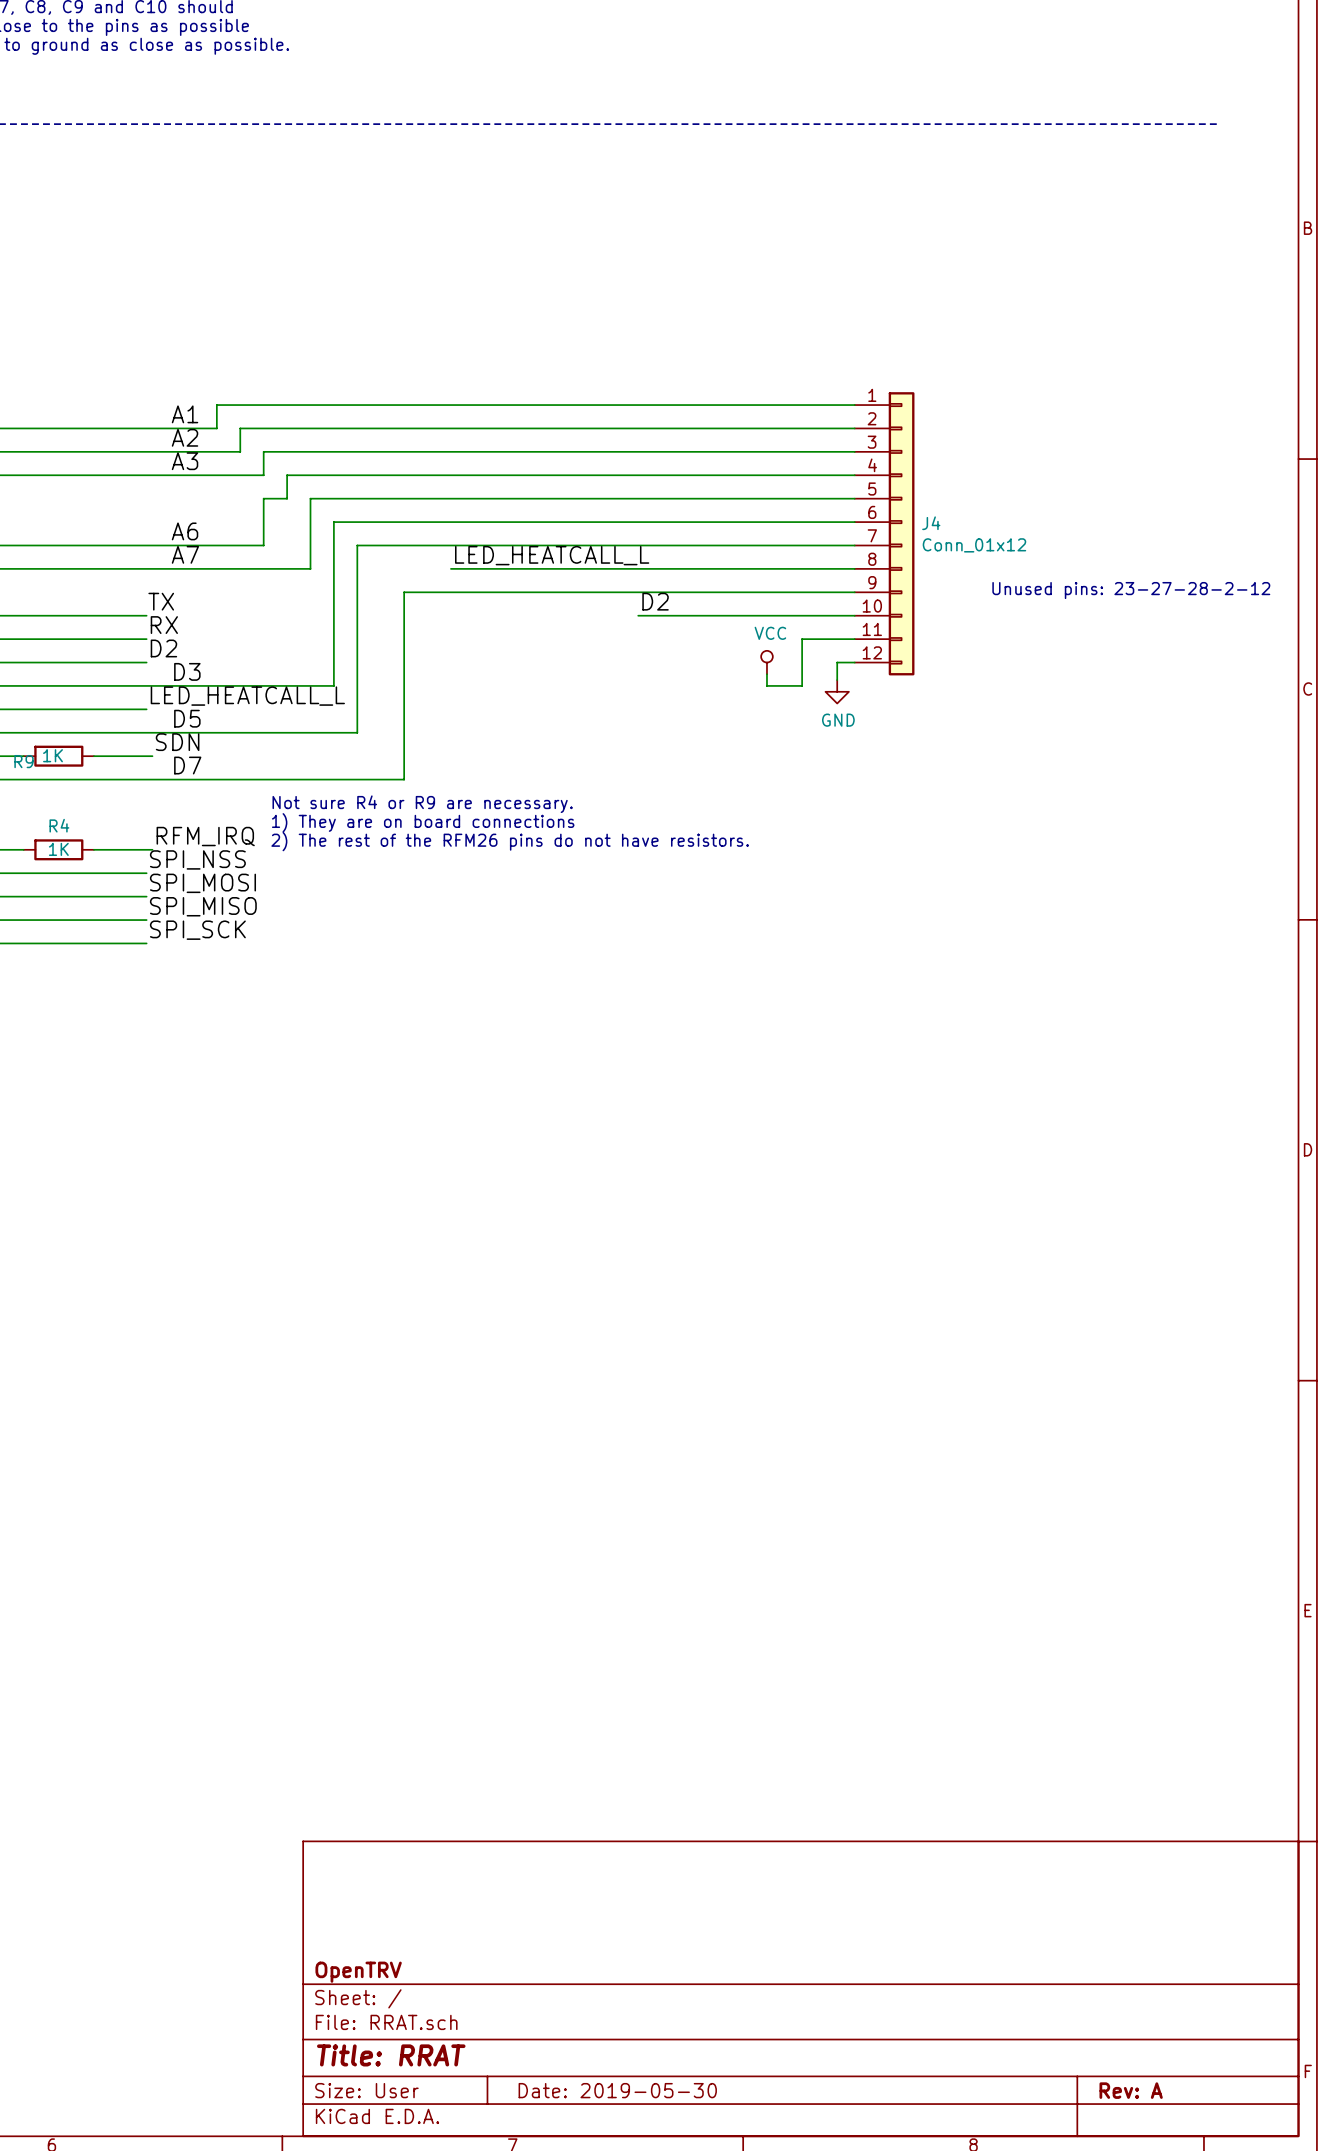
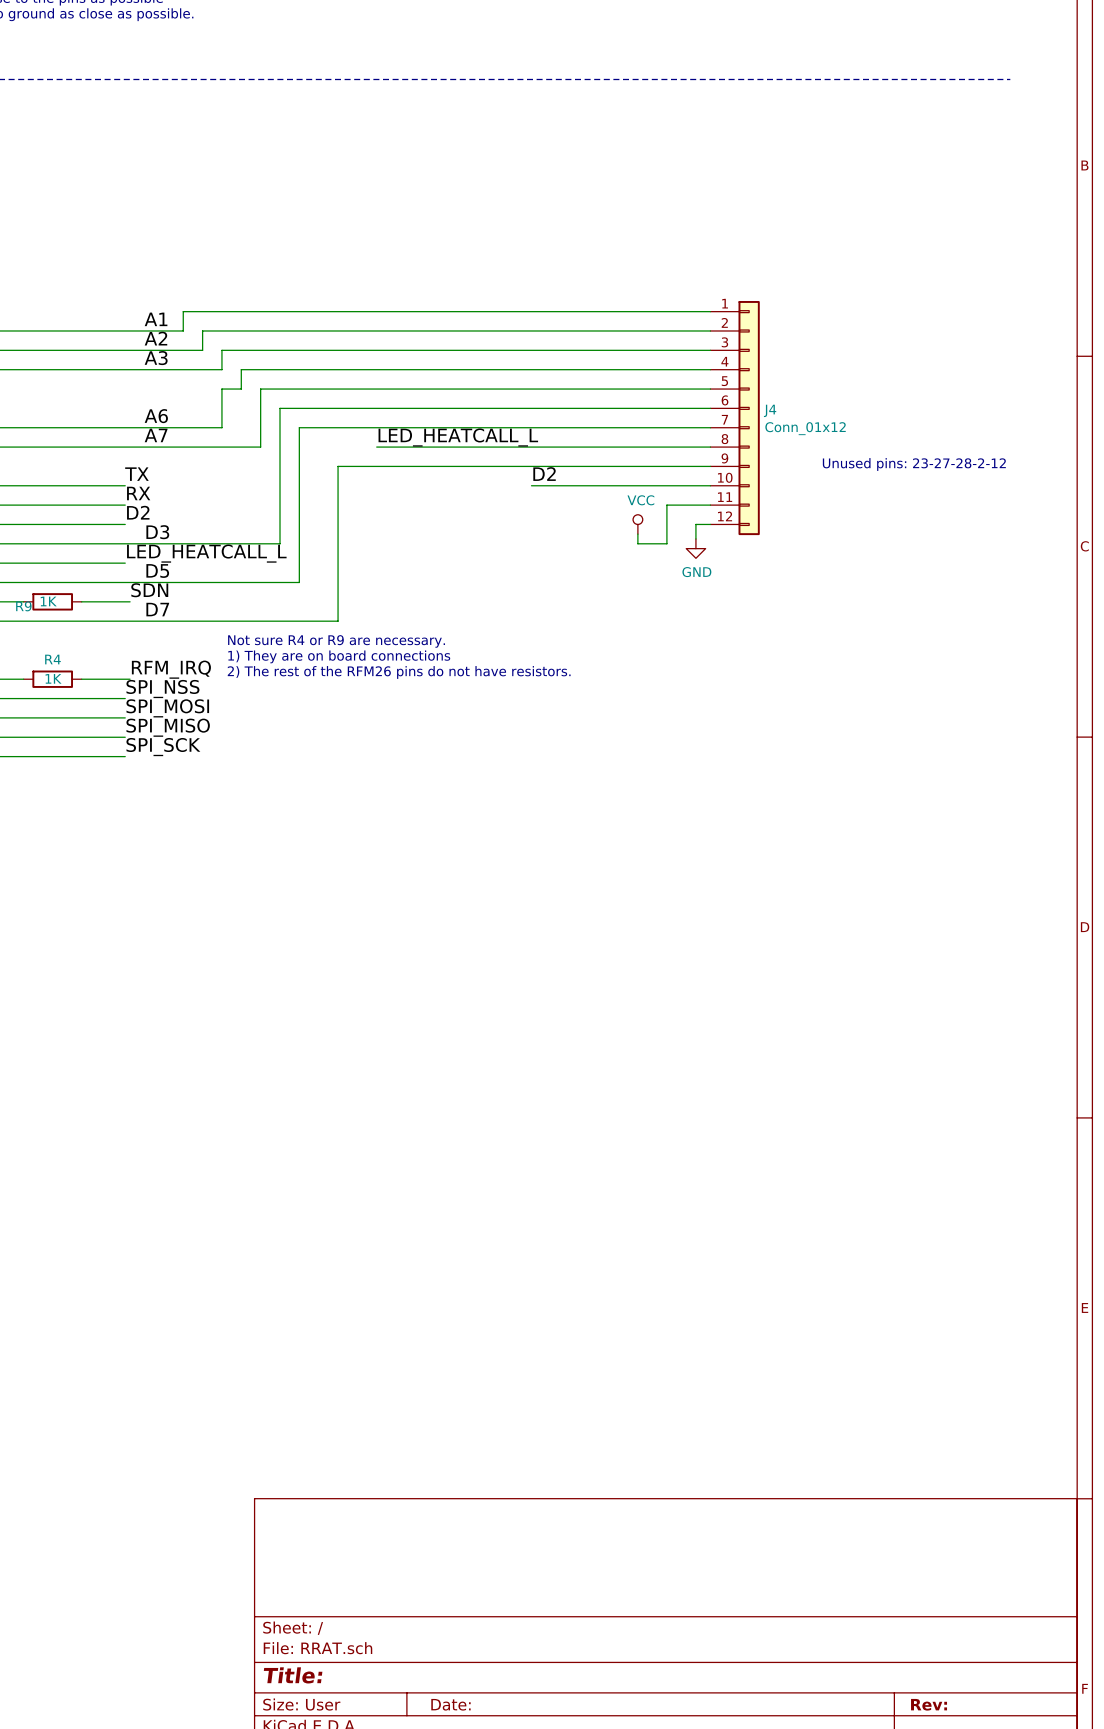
title block: OpenTRV (358, 1972) -> none
title block: Title: RRAT (391, 2055) -> Title: (293, 1675)
title block: Date: 2019-05-30 (617, 2090) -> Date: (450, 1704)
title block: Rev: A (1131, 2090) -> Rev: (929, 1704)

